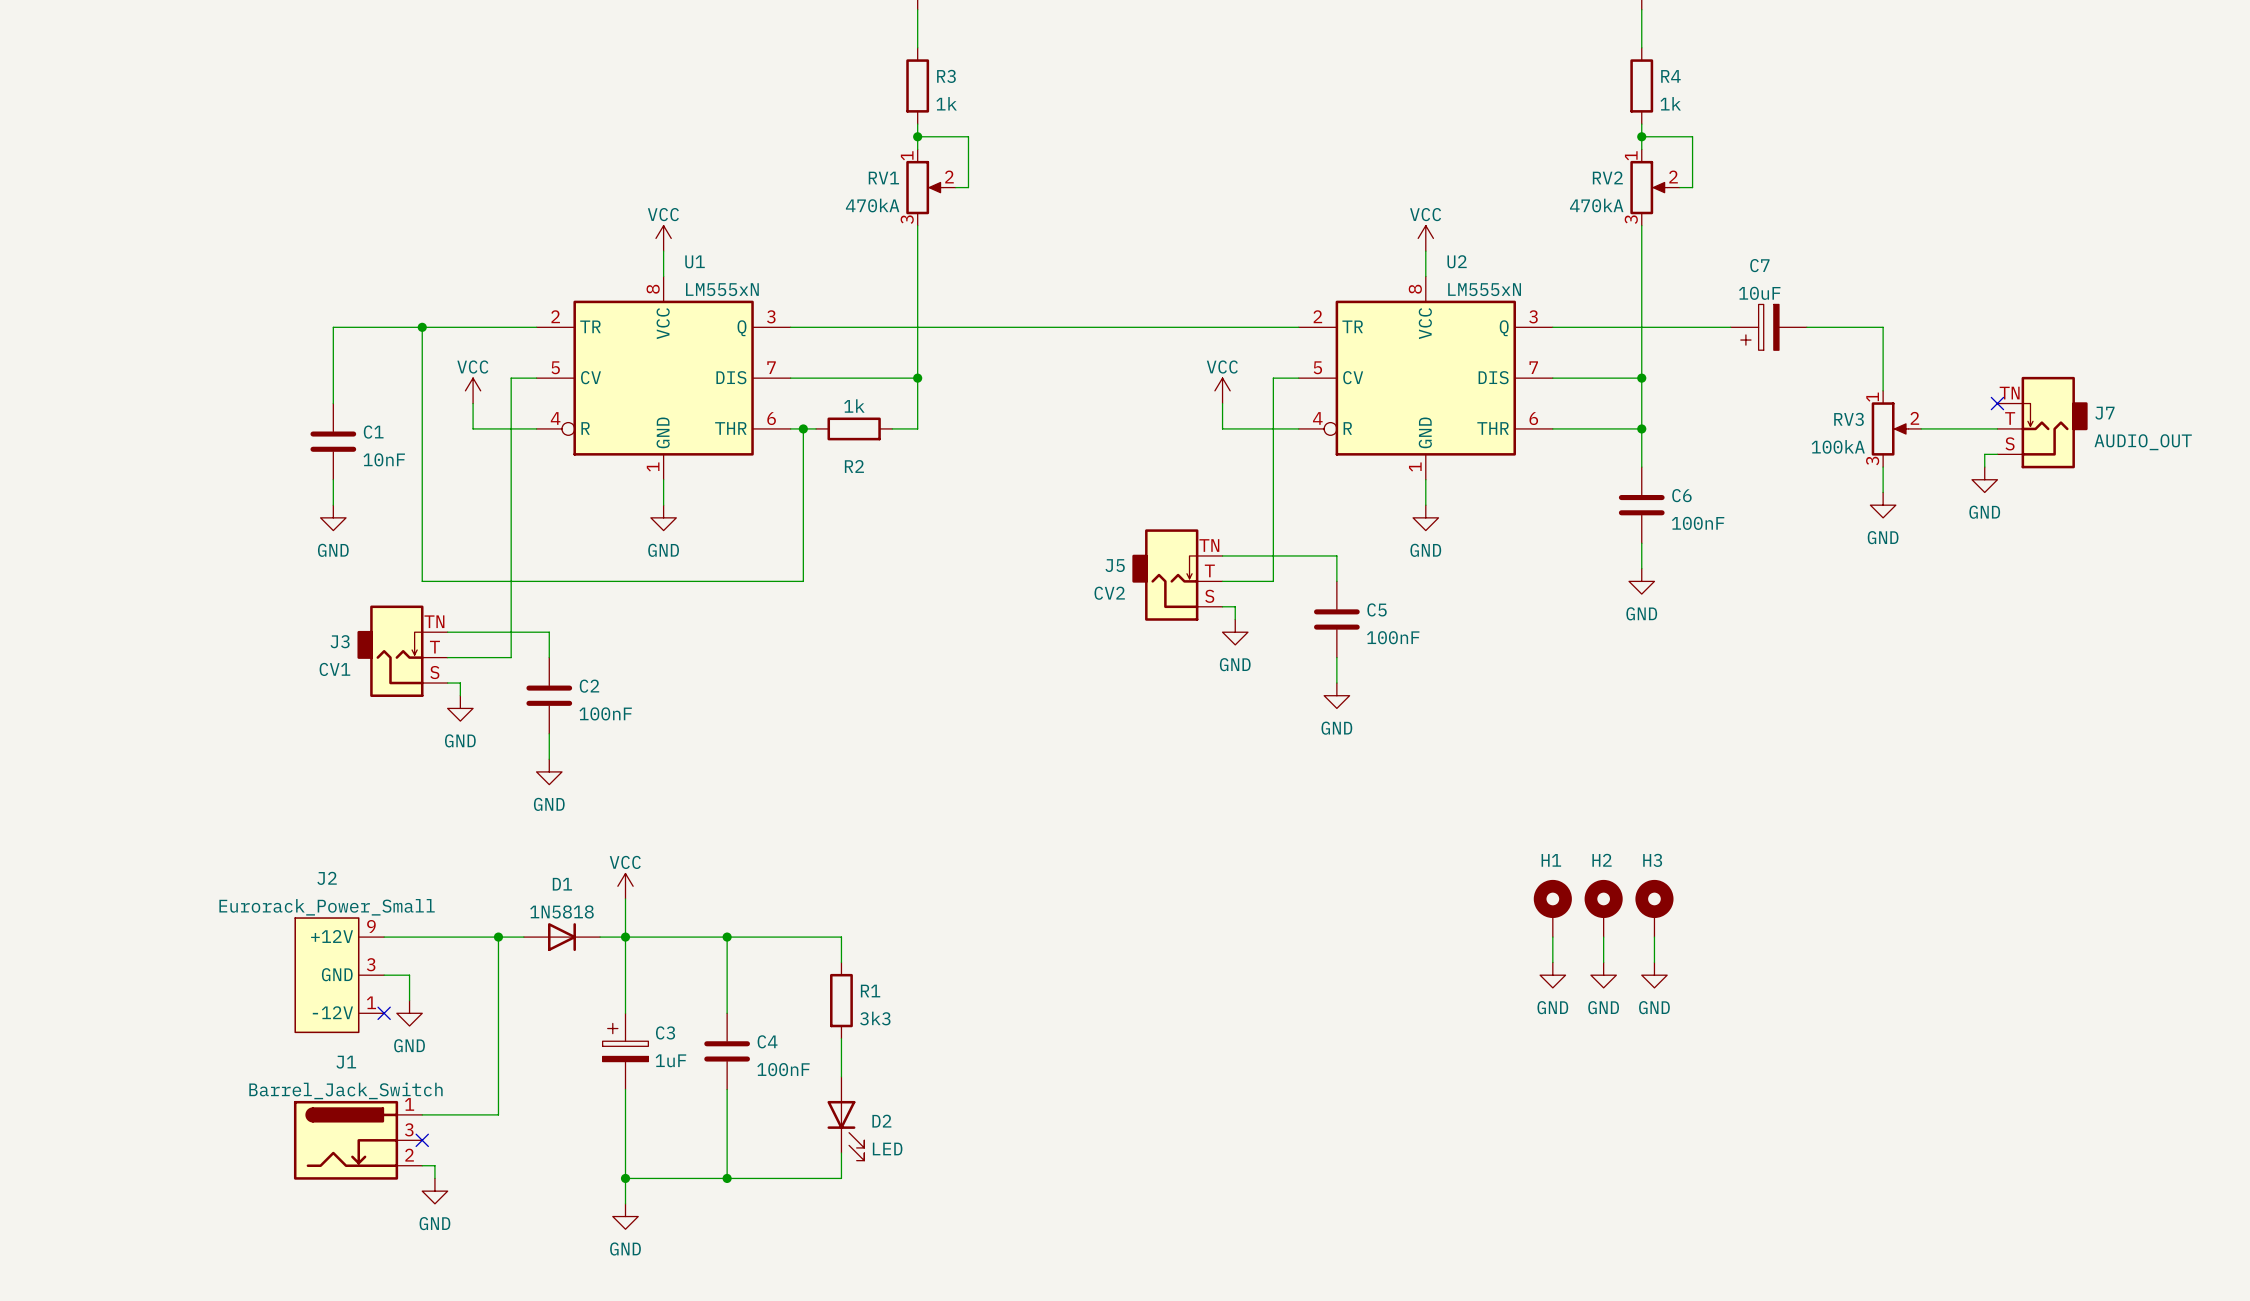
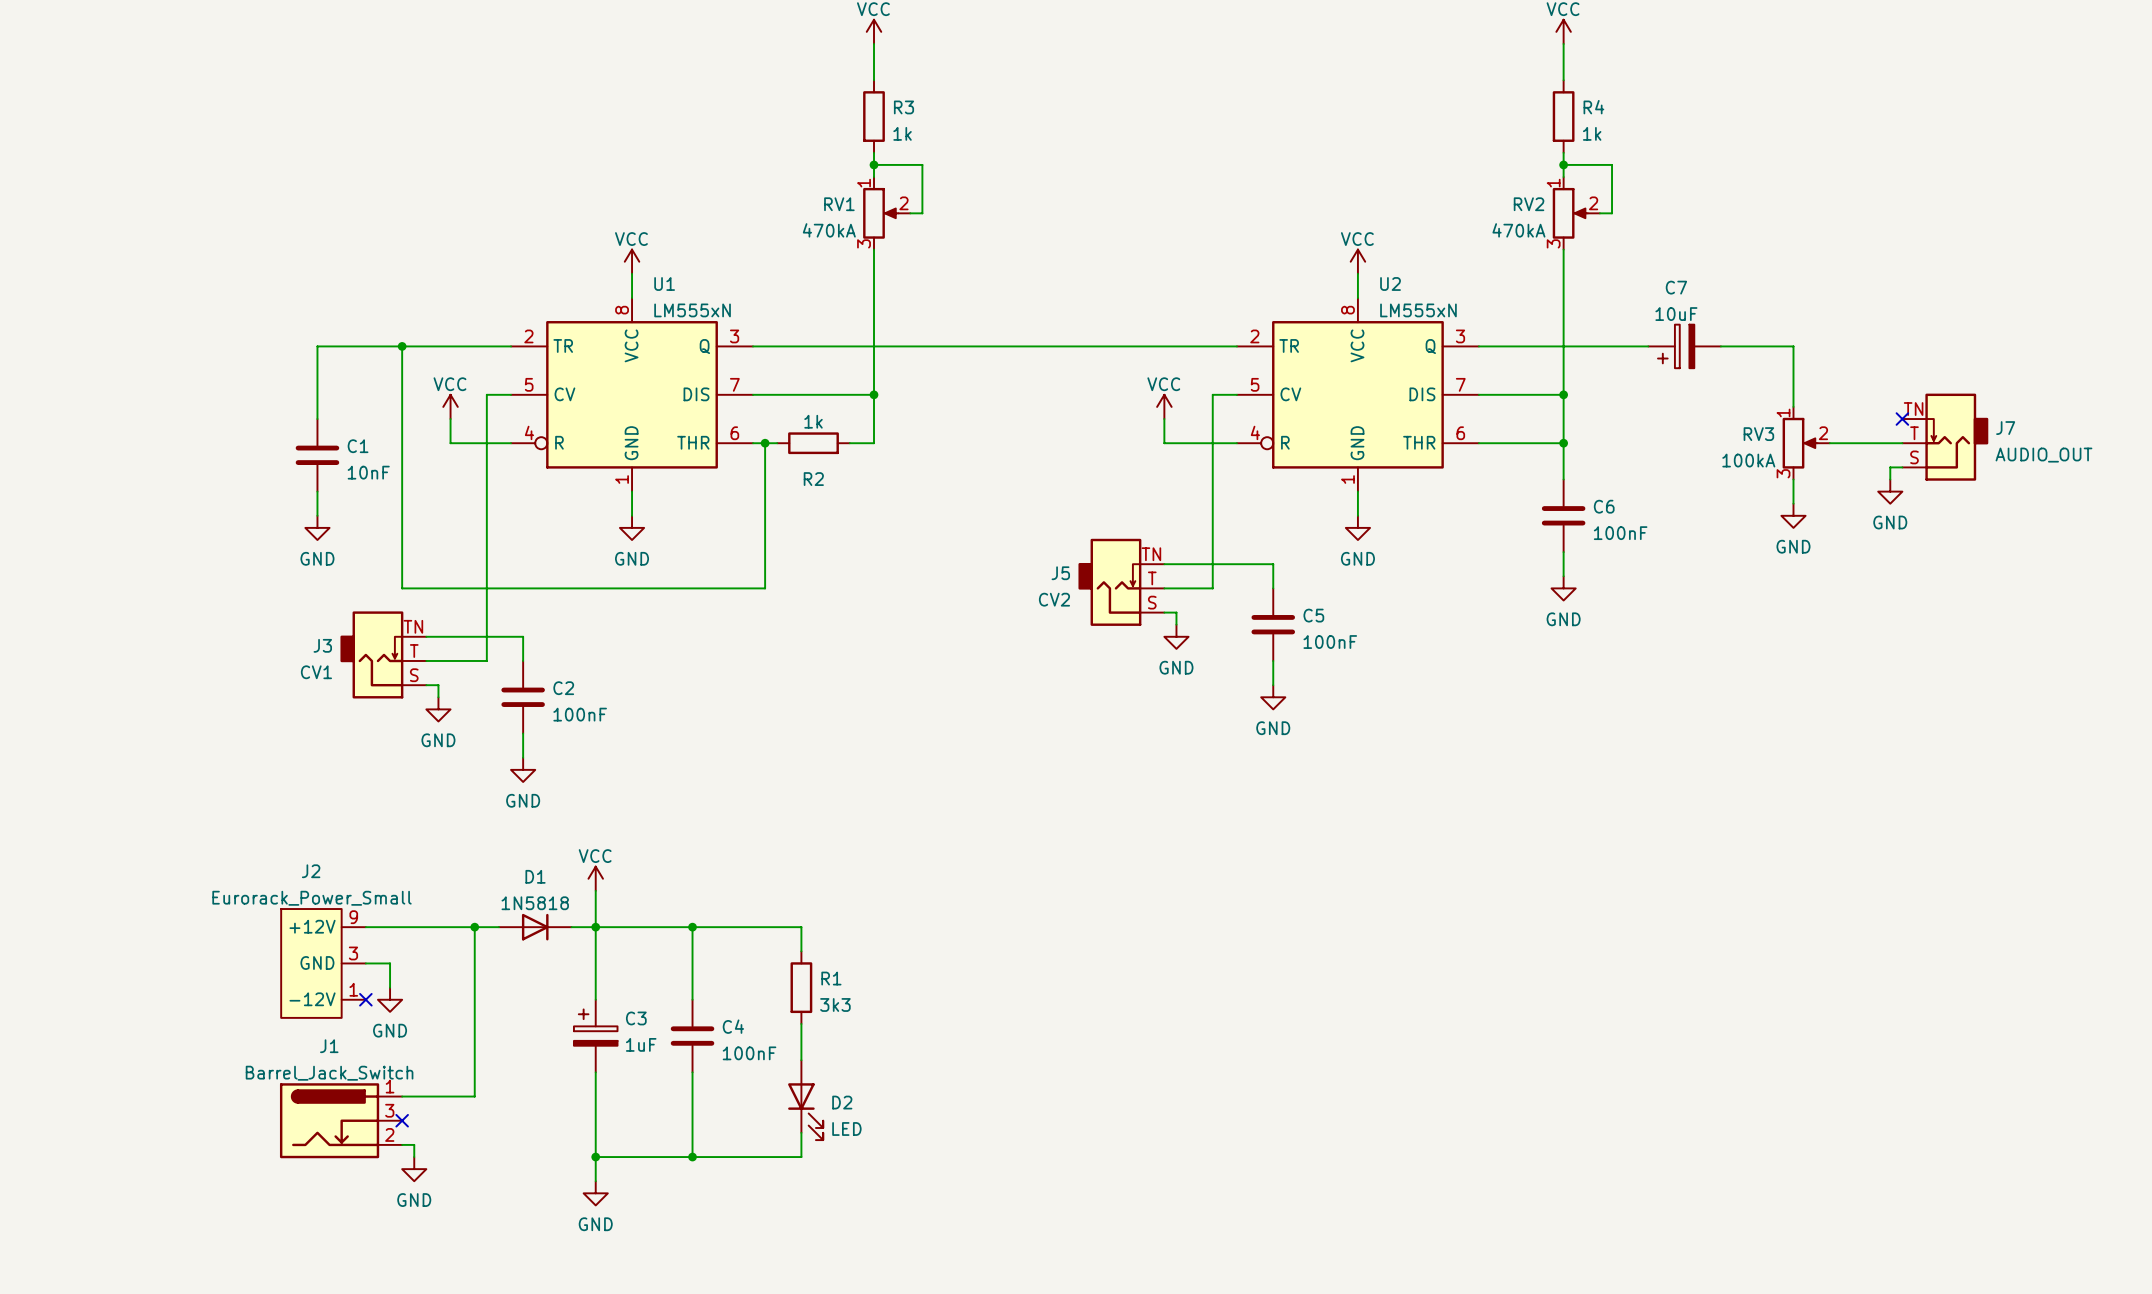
H1: (1552, 908) -> none
H2: (1603, 908) -> none
H3: (1654, 908) -> none
wire: (1552, 937) (1552, 962) -> none
wire: (1603, 937) (1603, 962) -> none
wire: (1654, 937) (1654, 962) -> none
power symbol: GND (1552, 975) -> none
power symbol: GND (1603, 975) -> none
power symbol: GND (1654, 975) -> none

